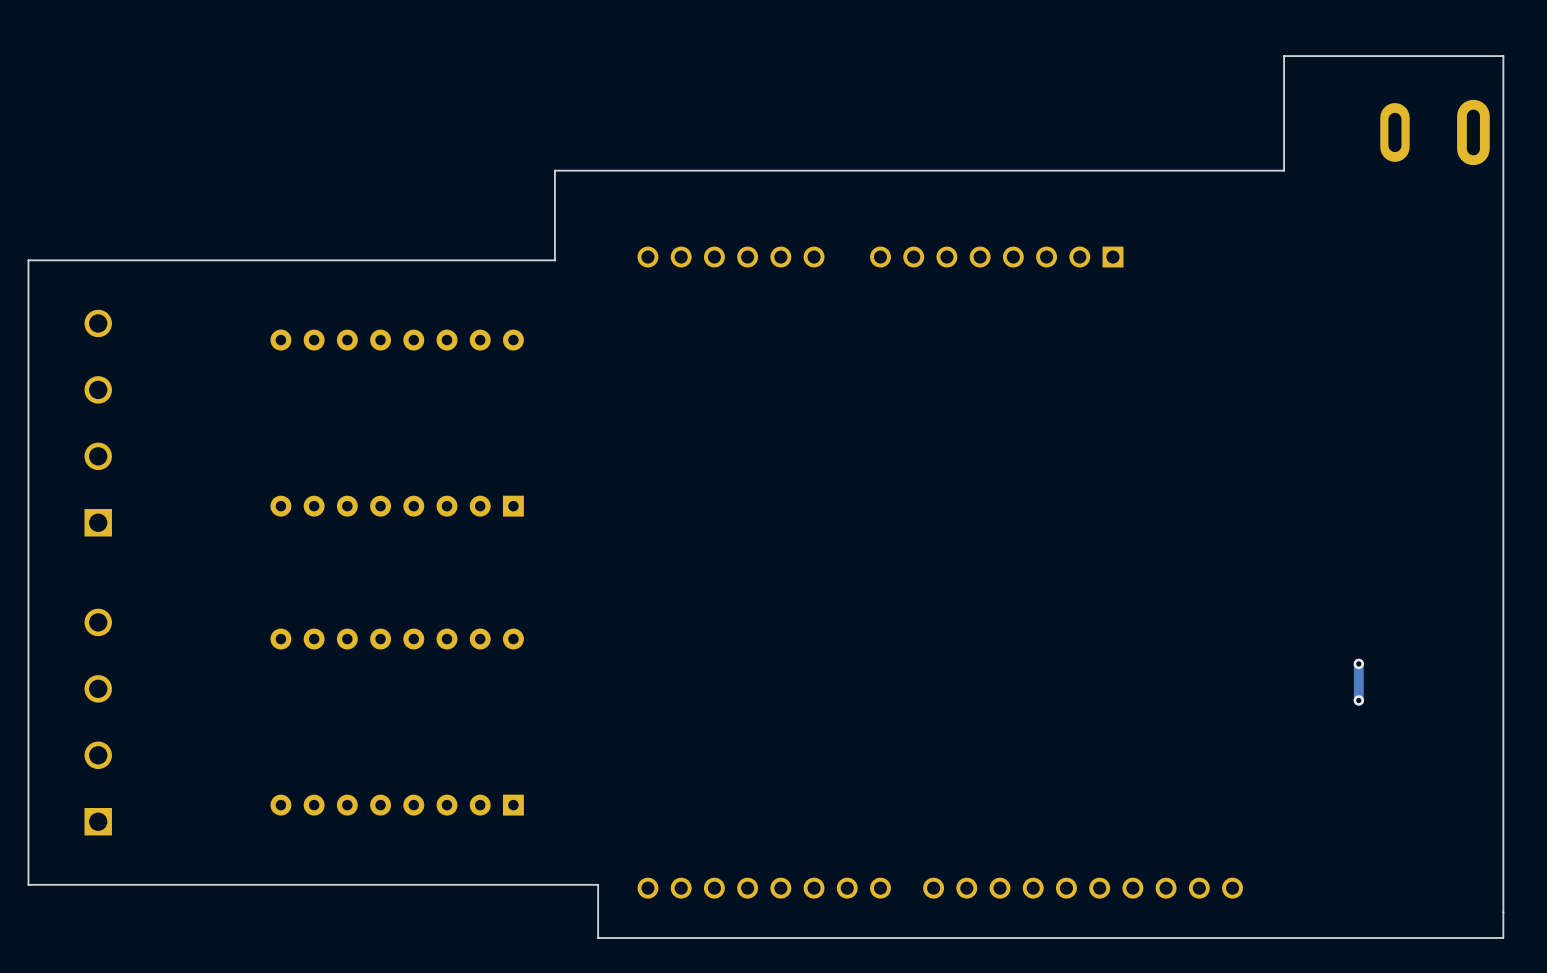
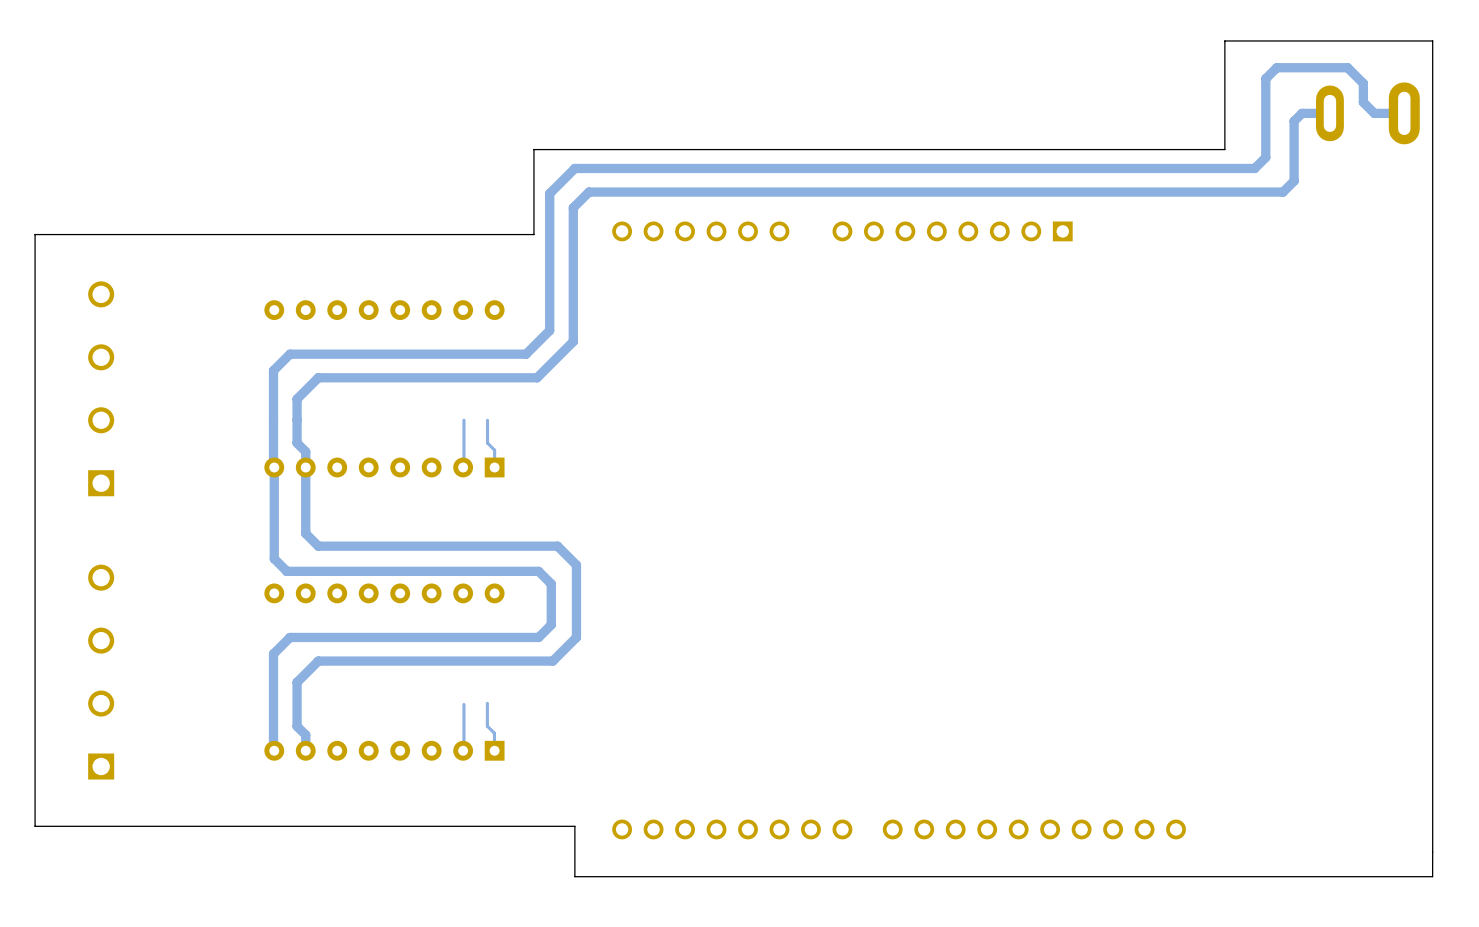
track: none -> (1329, 113) (1301, 113) (1294, 121) (1294, 181) (1283, 192) (589, 192) (573, 207) (573, 341) (537, 377) (318, 377) (297, 399) (297, 443) (305, 451) (305, 533) (318, 546) (557, 546) (576, 565) (576, 637) (552, 661) (318, 661) (297, 682) (297, 726) (305, 735) (305, 750)
track: none -> (1404, 113) (1374, 113) (1363, 102) (1363, 83) (1347, 67) (1276, 67) (1265, 78) (1265, 157) (1254, 168) (574, 168) (549, 193) (549, 330) (526, 354) (290, 354) (273, 370) (273, 466)
track: none -> (463, 420) (463, 466)
track: none -> (487, 420) (487, 443) (494, 450) (494, 467)
track: none -> (274, 467) (274, 558) (286, 571) (538, 571) (551, 583) (551, 624) (538, 637) (290, 637) (273, 653) (273, 750)
track: (1358, 663) (1358, 700) -> none
via: (1358, 663) -> none
via: (1358, 700) -> none
track: none -> (487, 703) (487, 726) (494, 733) (494, 750)
track: none -> (463, 704) (463, 749)

